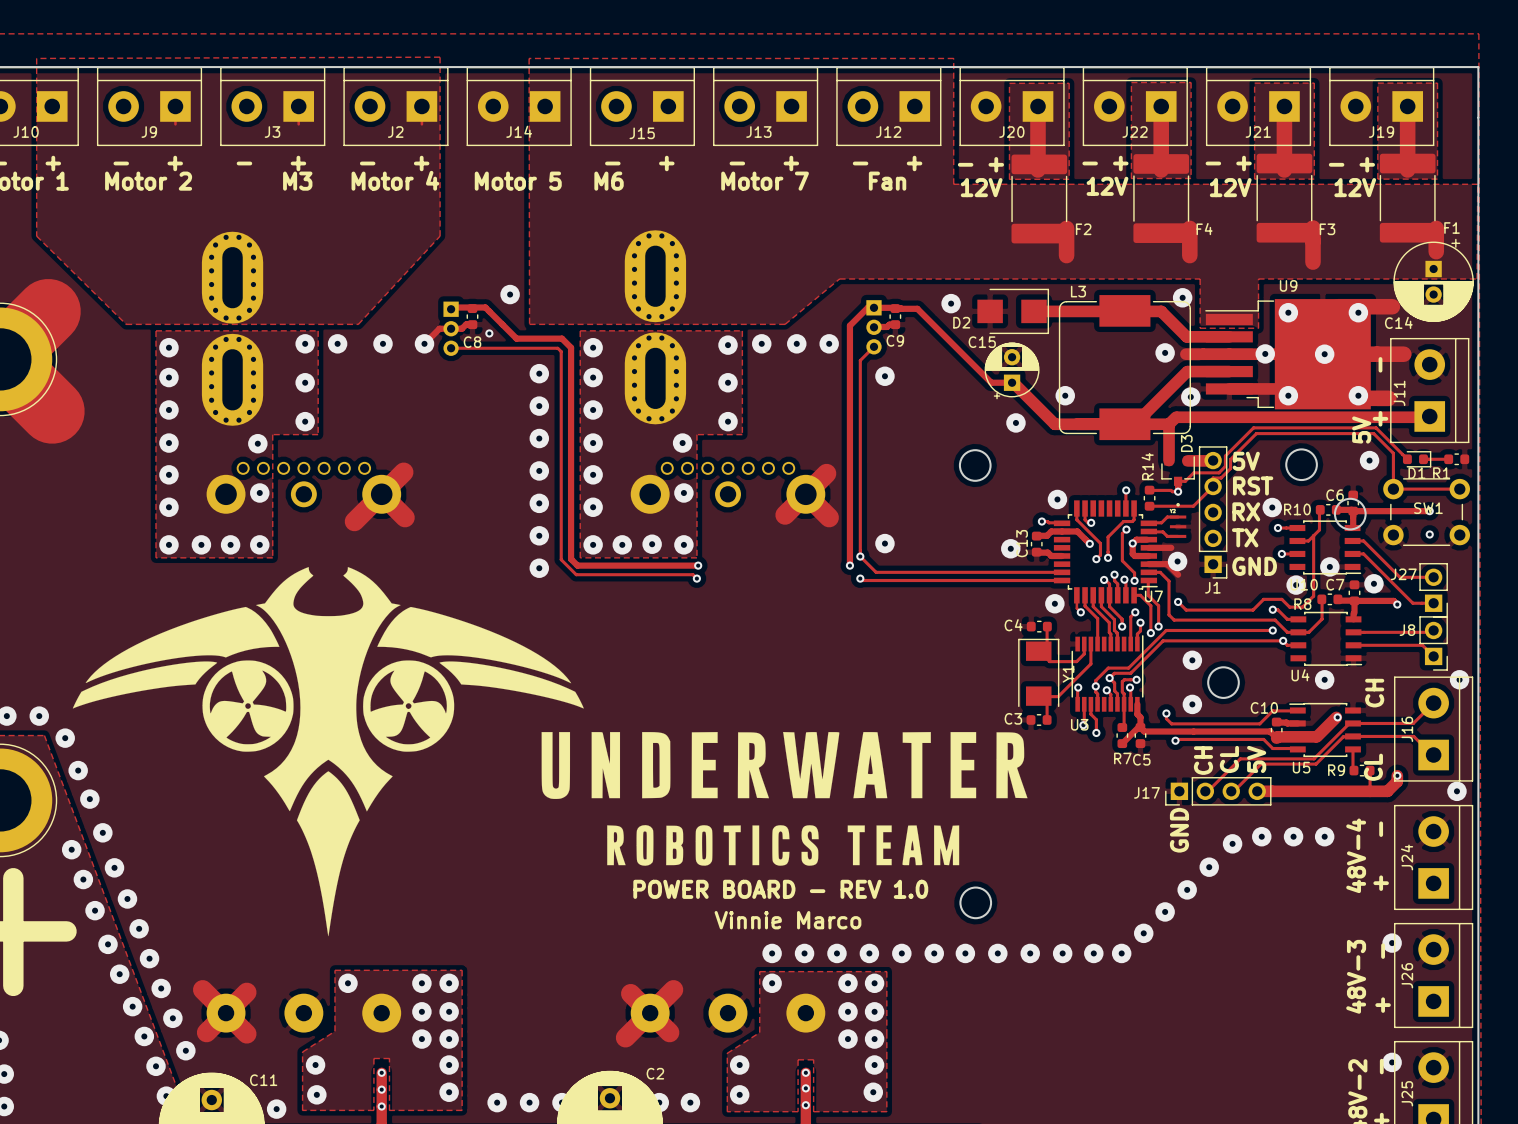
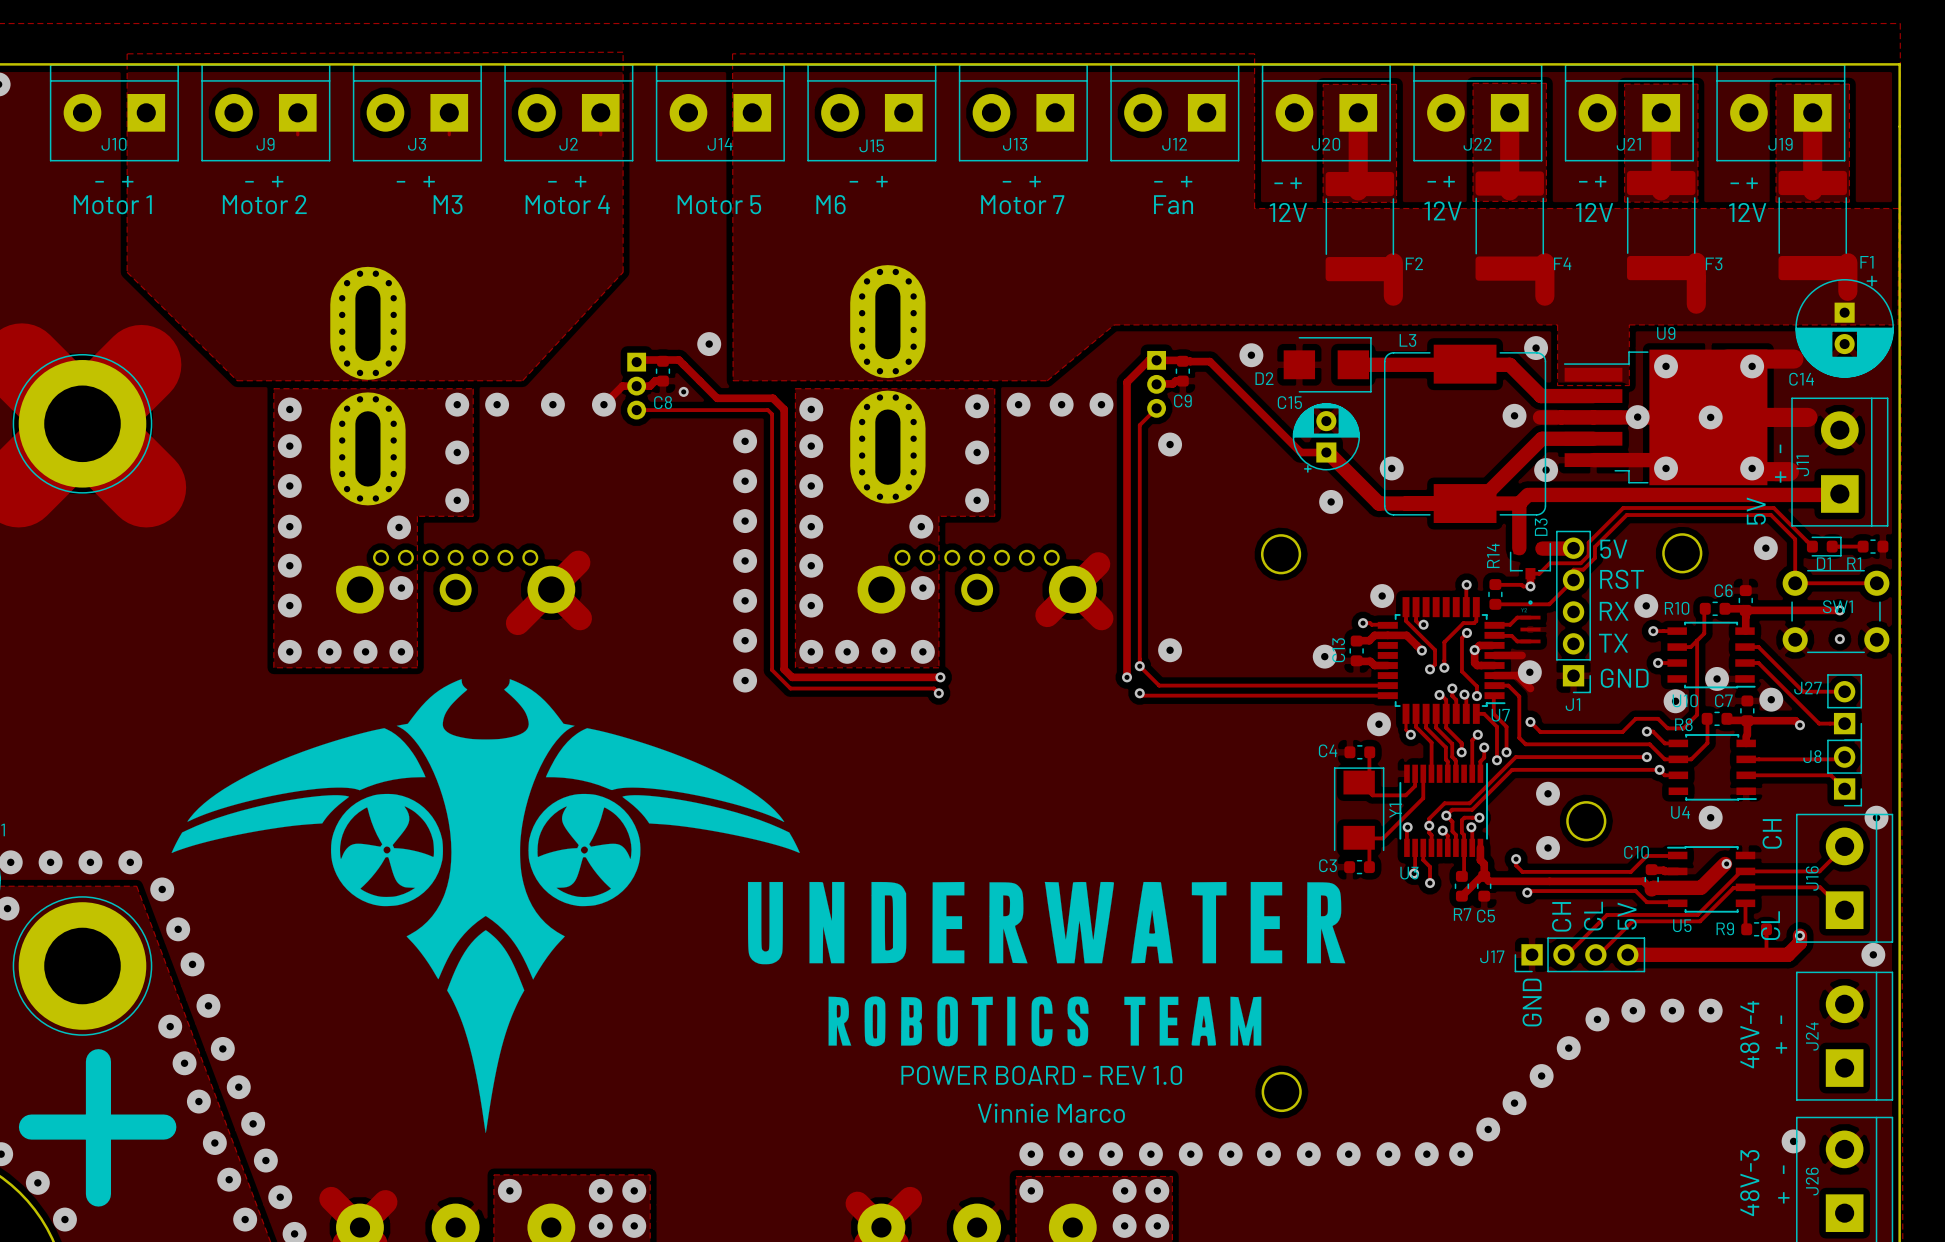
round board edge: [1333, 497, 1367, 531] -> none

